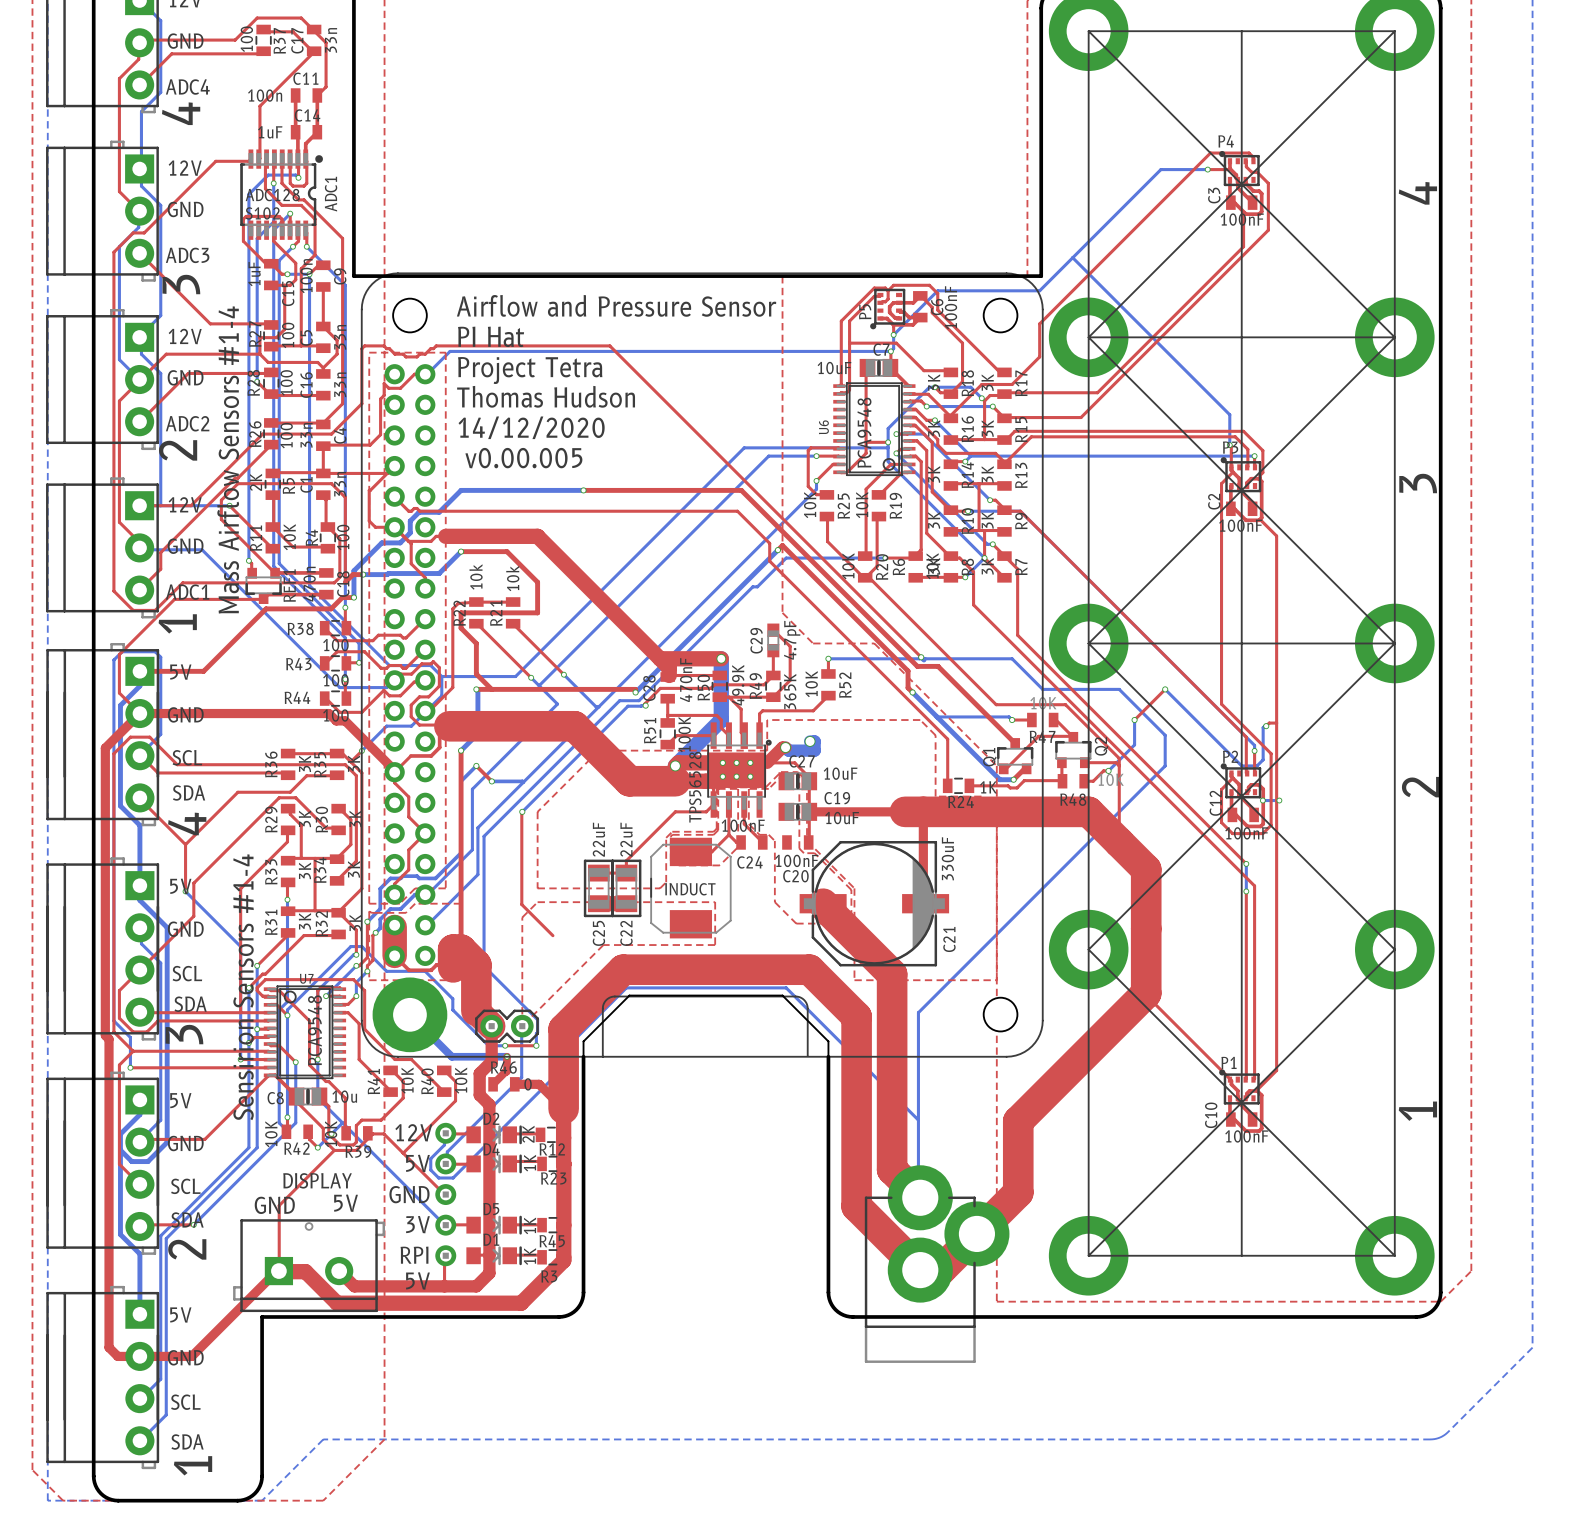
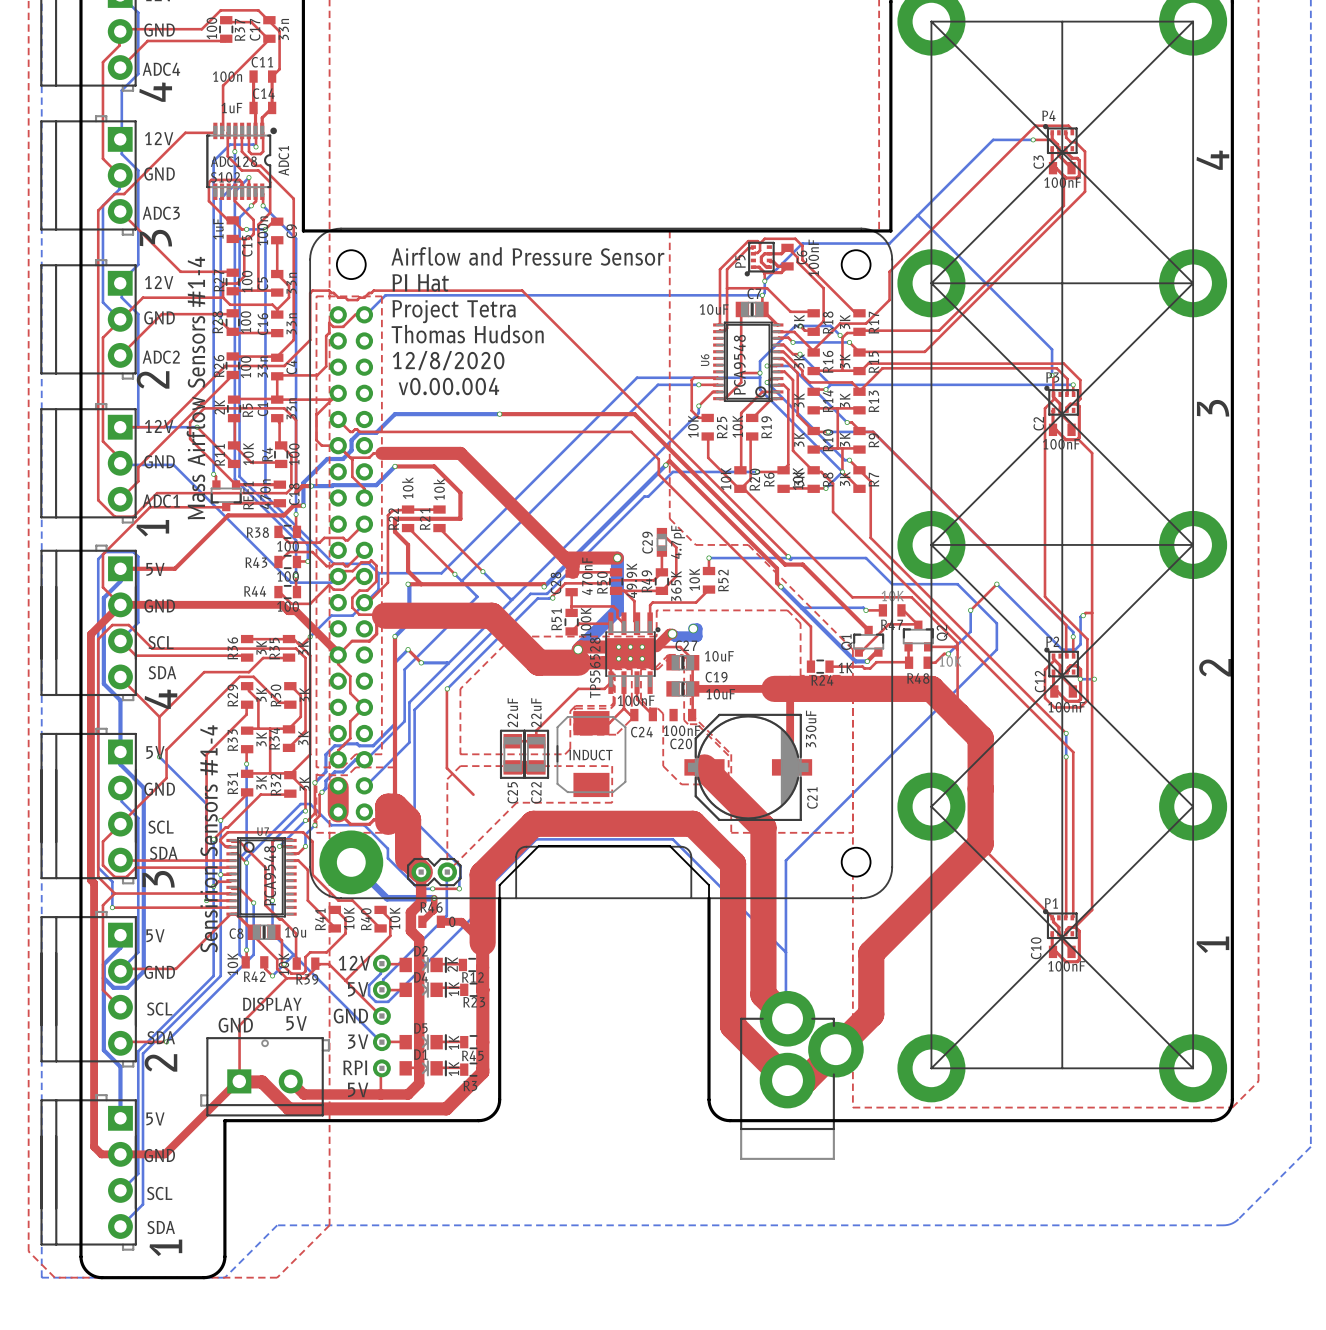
text: 14/12/2020 (531, 427) -> 12/8/2020 (448, 360)
text: v0.00.005 (523, 458) -> v0.00.004 (448, 386)

